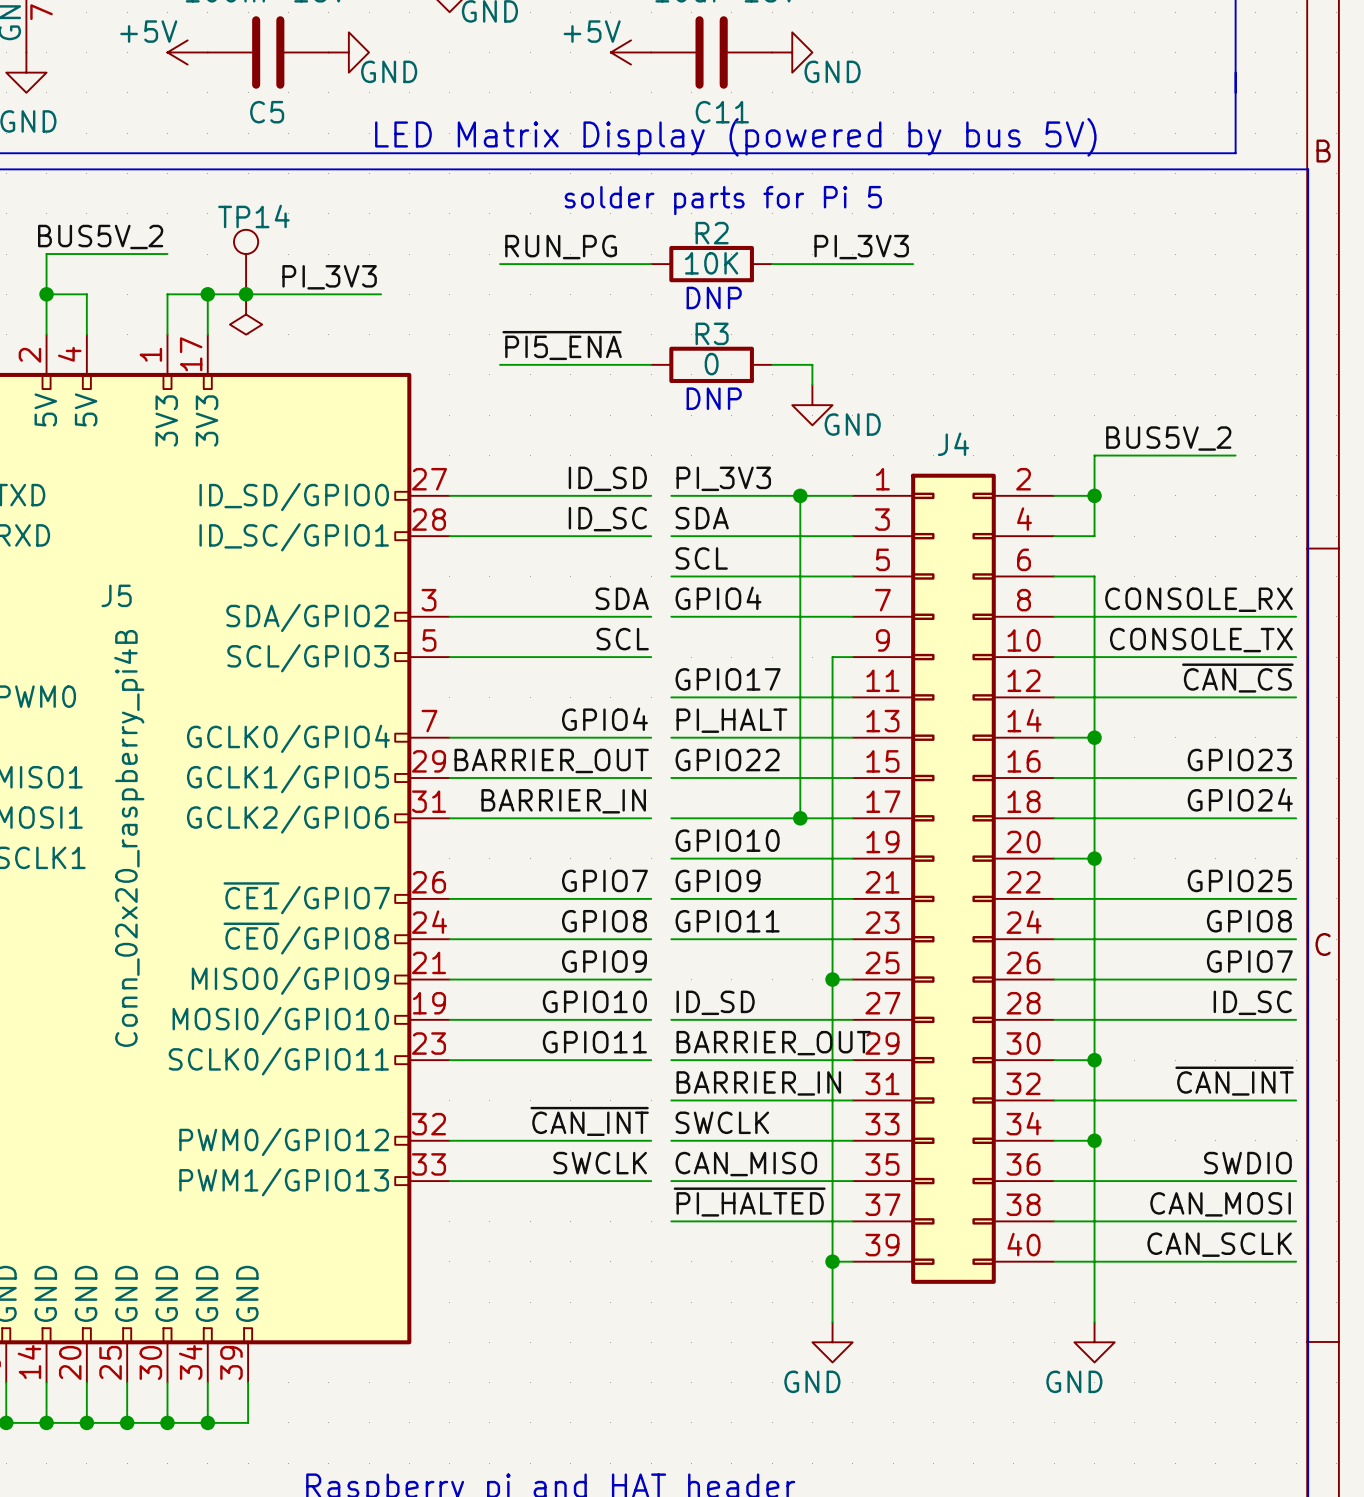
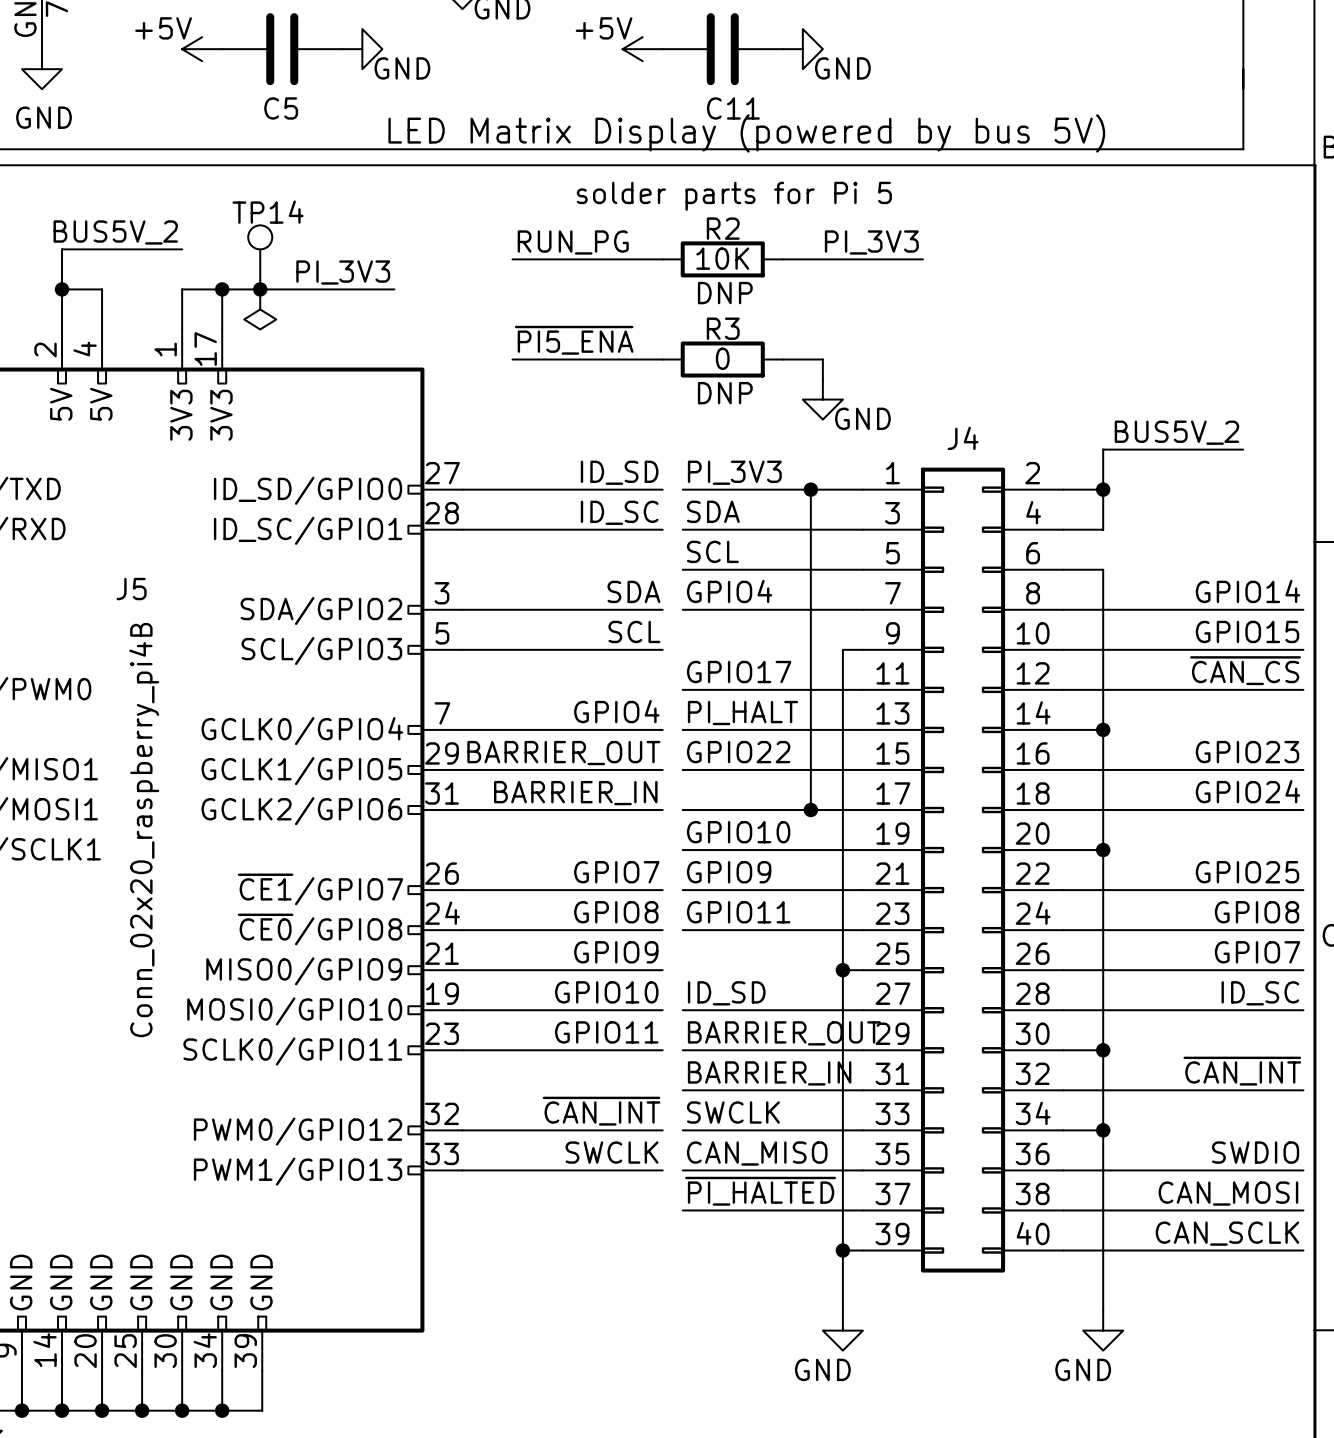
label: CONSOLE_RX (1199, 599) -> GPIO14 (1247, 591)
label: CONSOLE_TX (1201, 640) -> GPIO15 (1247, 631)

